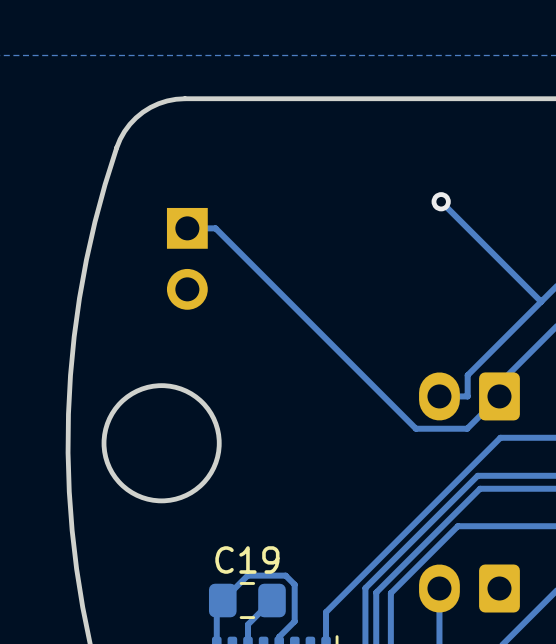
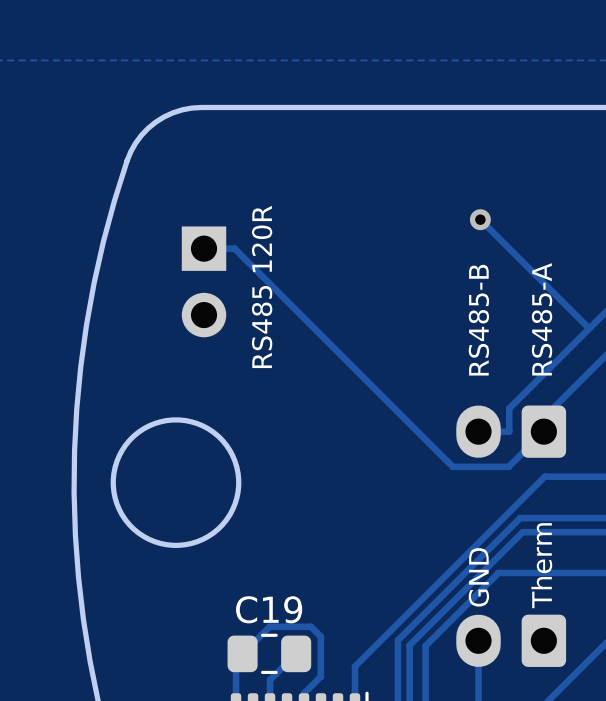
text: none -> RS485 120R (262, 286)
text: none -> RS485-B (478, 320)
text: none -> RS485-A (542, 319)
text: none -> Therm (541, 565)
text: none -> GND (478, 577)

